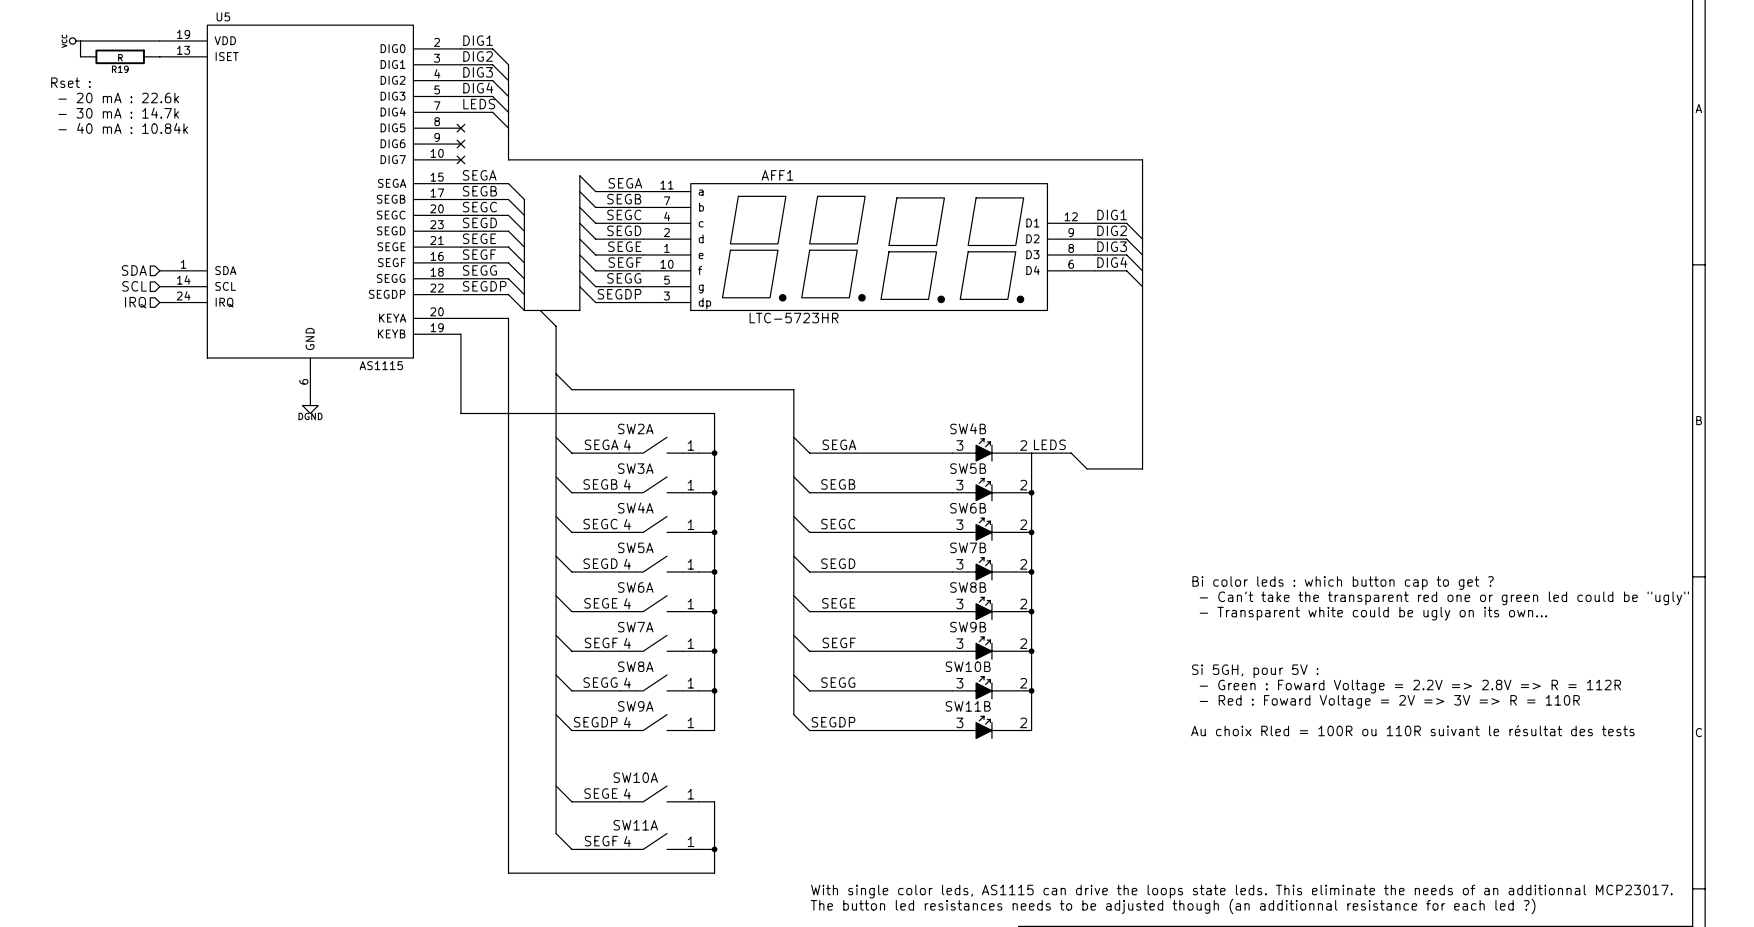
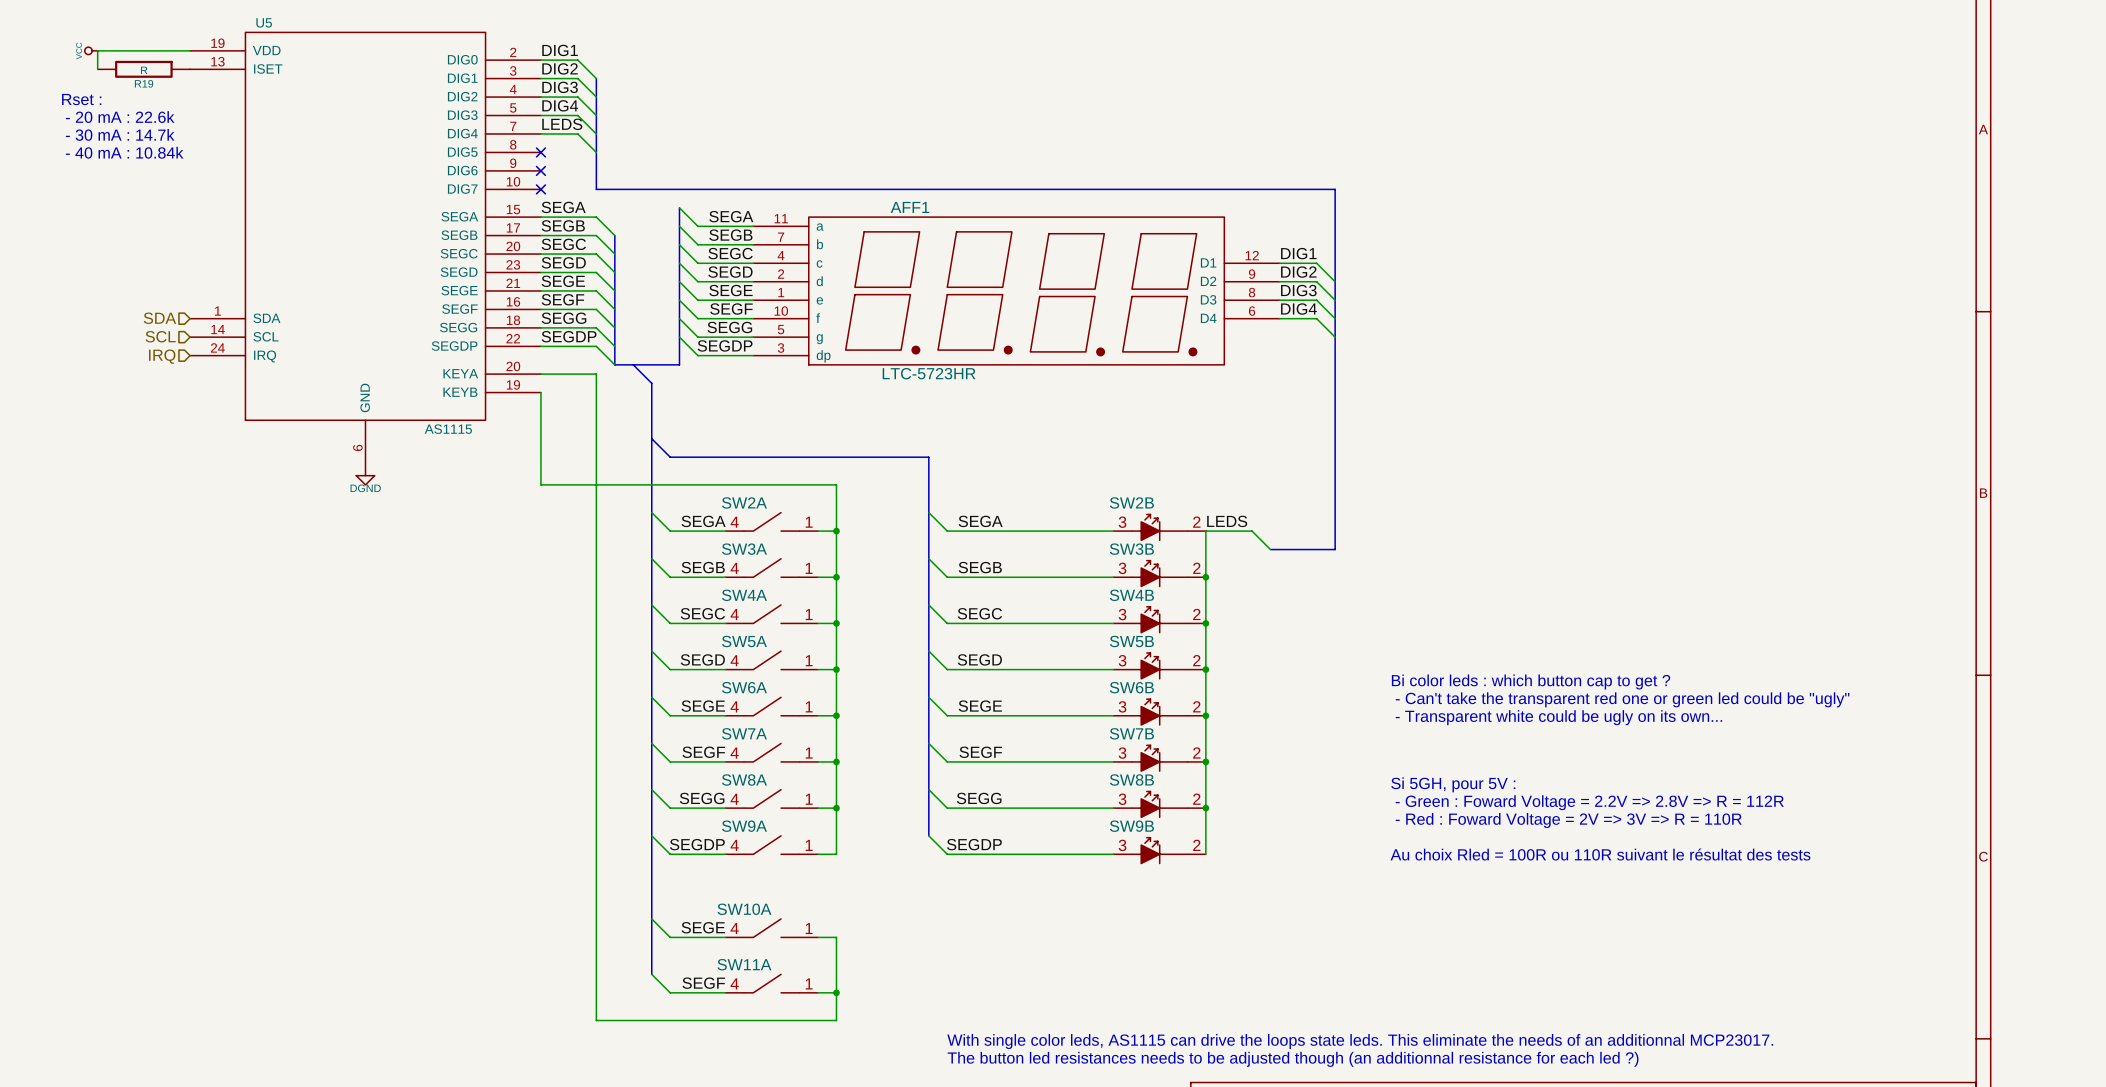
SW4B name: SW4B (968, 428) -> SW2B (1131, 502)
SW5B name: SW5B (968, 468) -> SW3B (1131, 549)
SW6B name: SW6B (968, 508) -> SW4B (1131, 595)
SW7B name: SW7B (968, 547) -> SW5B (1131, 641)
SW8B name: SW8B (968, 587) -> SW6B (1131, 687)
SW9B name: SW9B (968, 627) -> SW7B (1131, 733)
SW10B name: SW10B (968, 666) -> SW8B (1131, 780)
SW11B name: SW11B (968, 706) -> SW9B (1131, 826)

